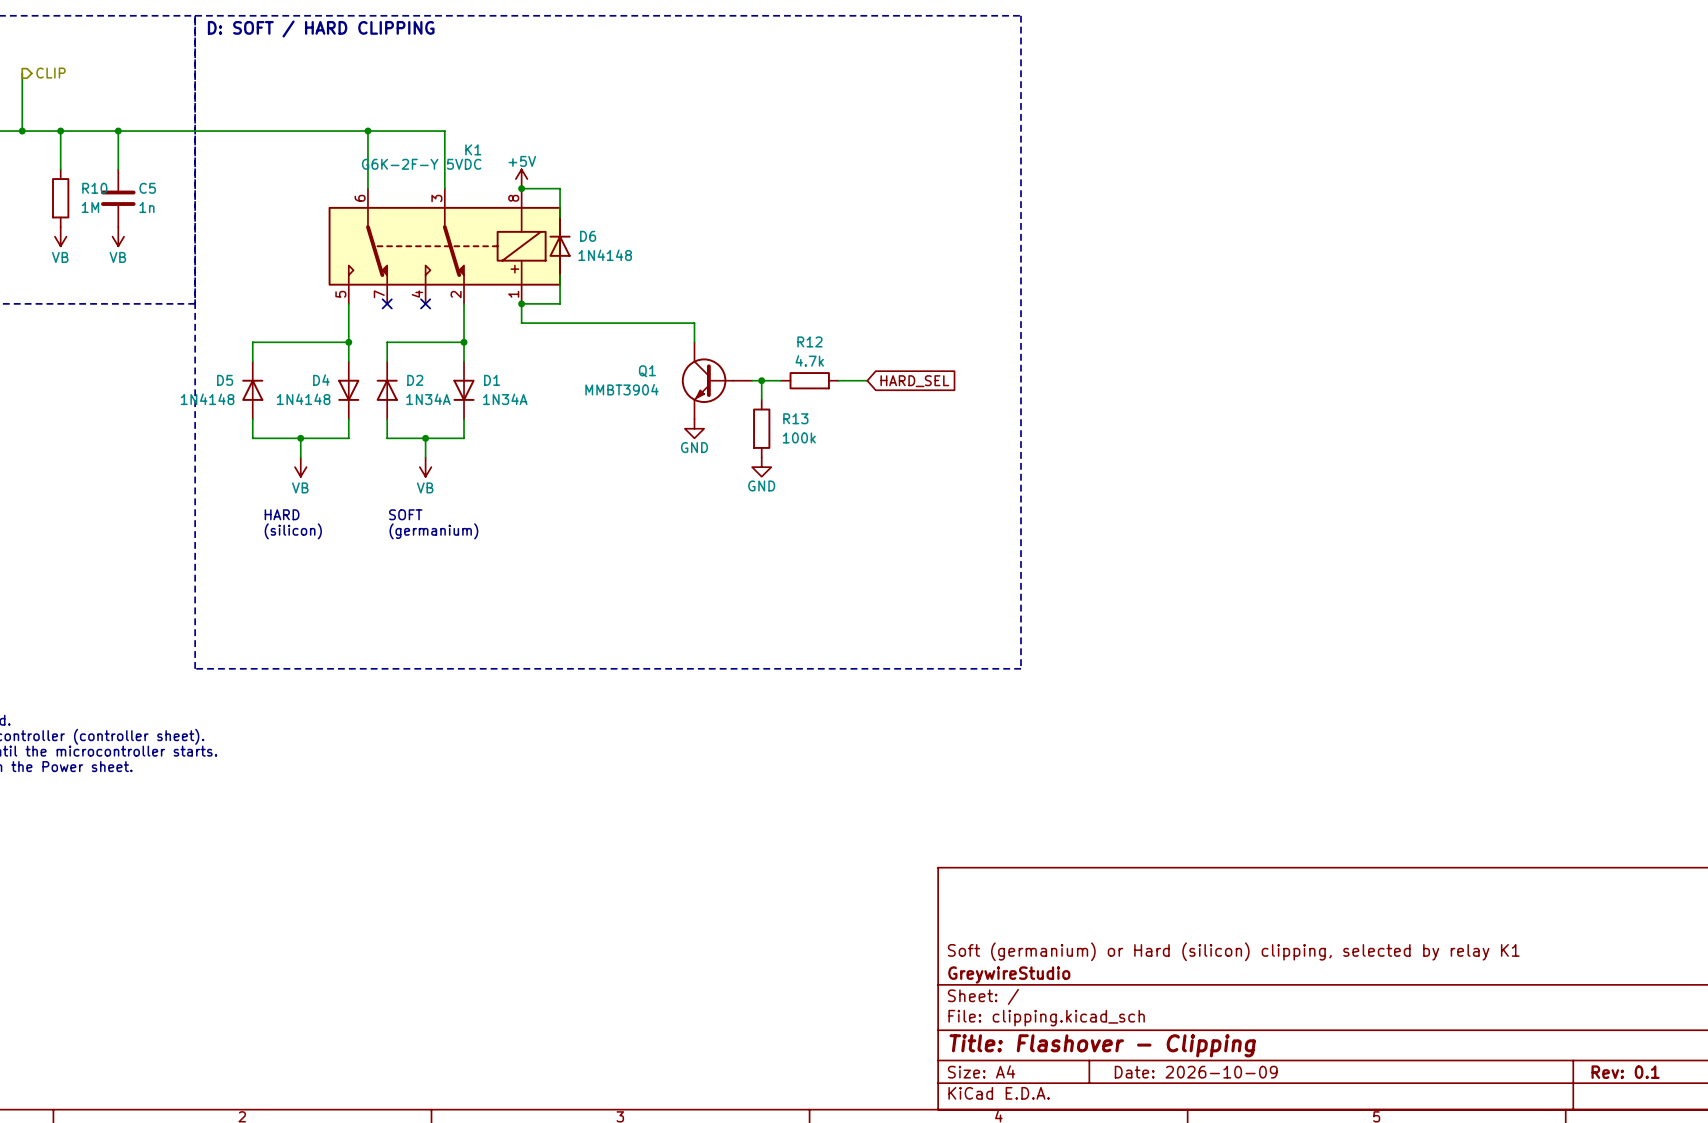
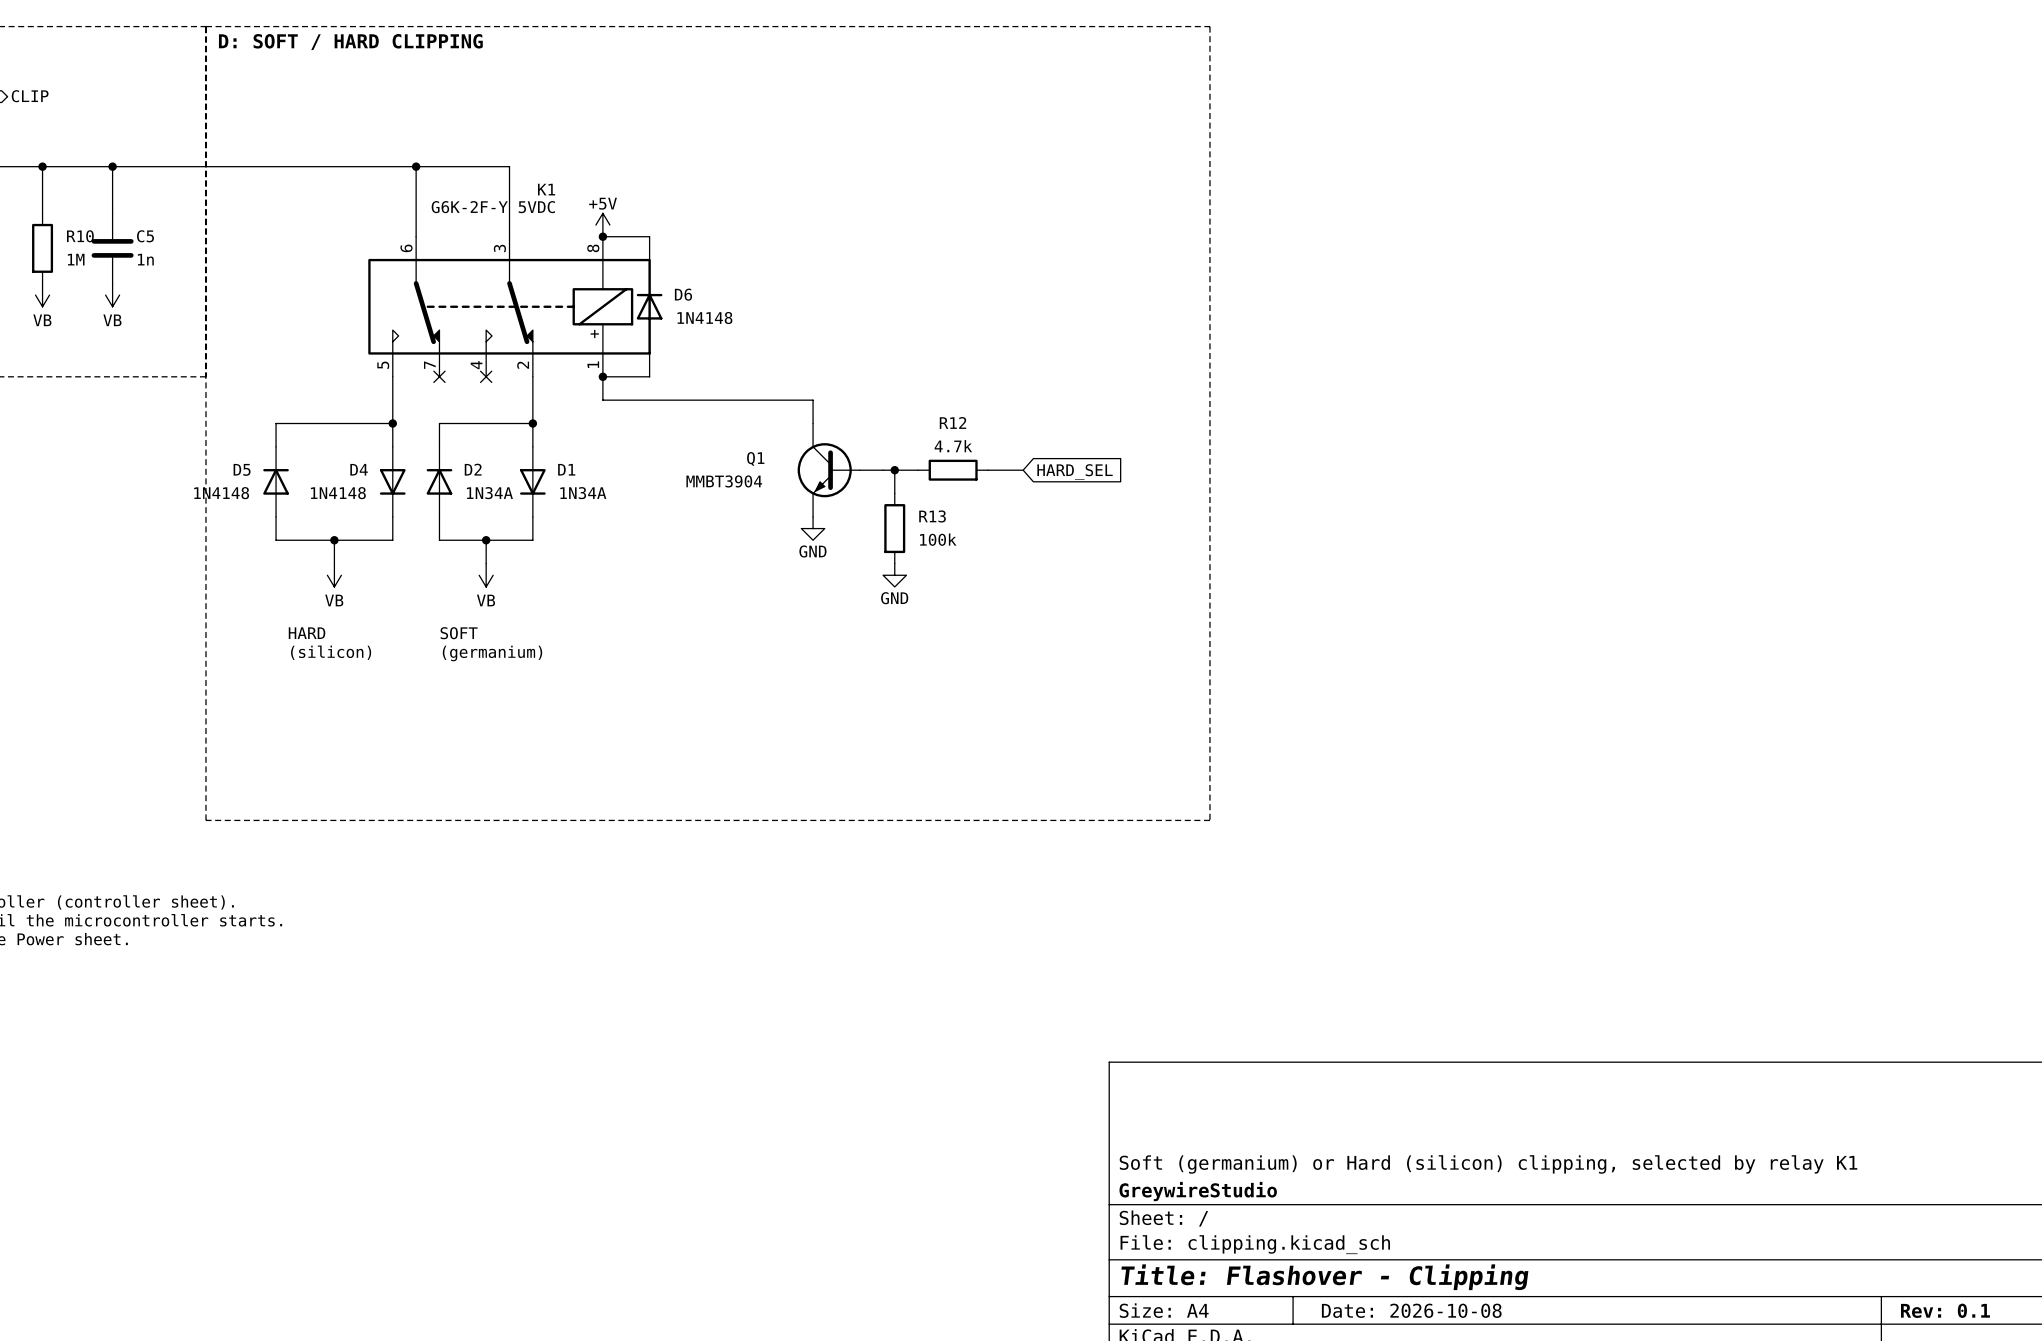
title block: Date: 2026-10-09 (1196, 1072) -> Date: 2026-10-08 (1411, 1310)

